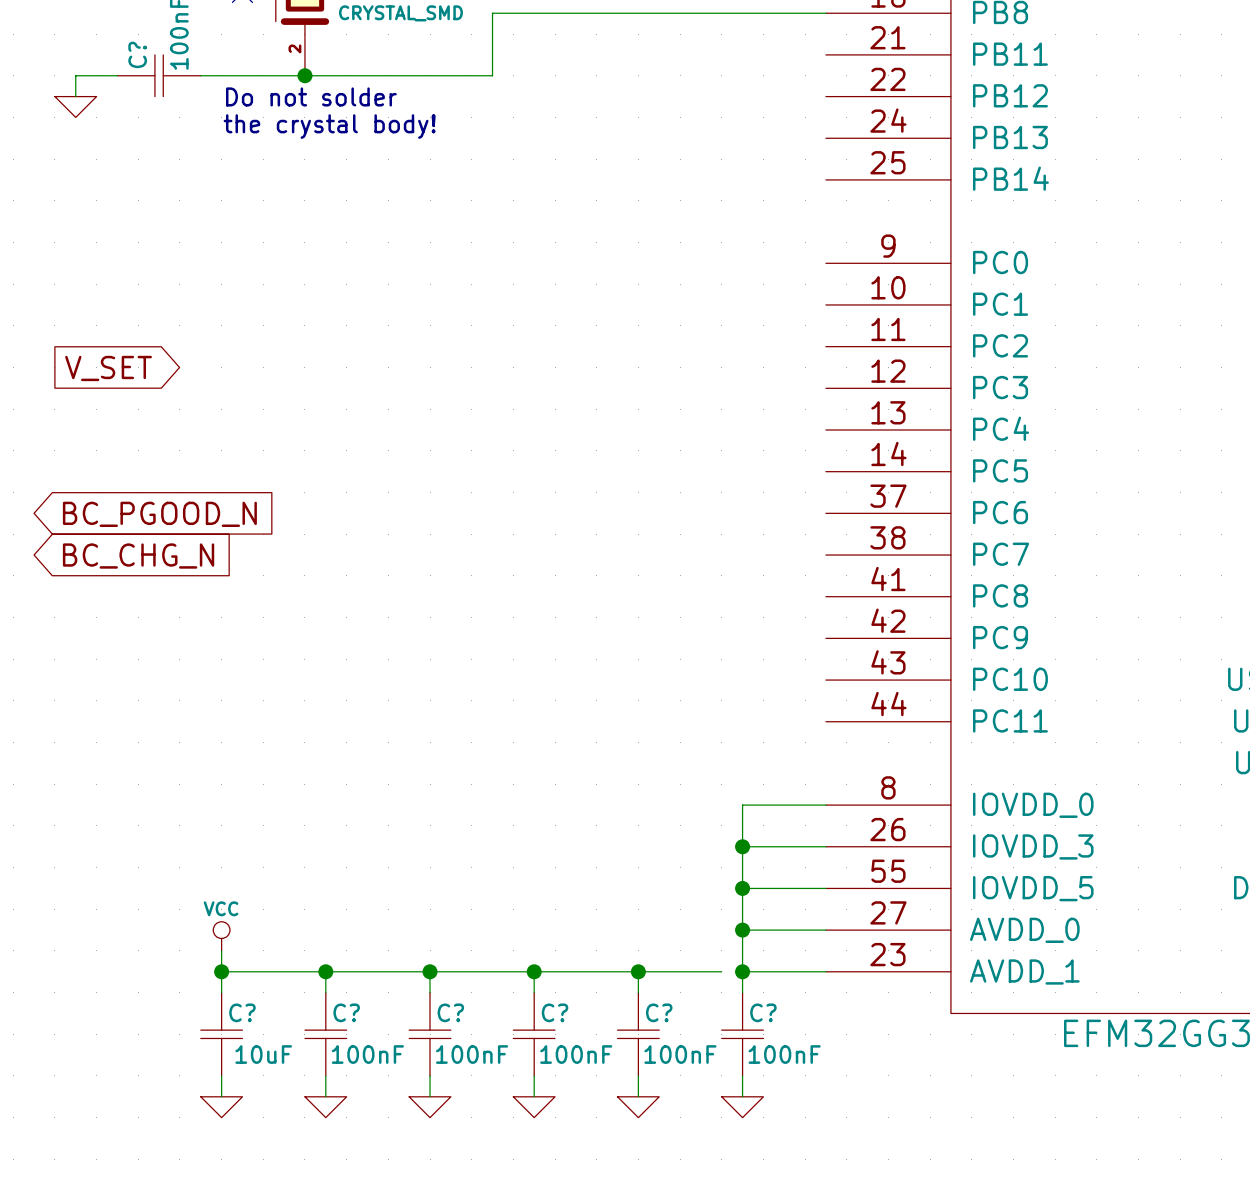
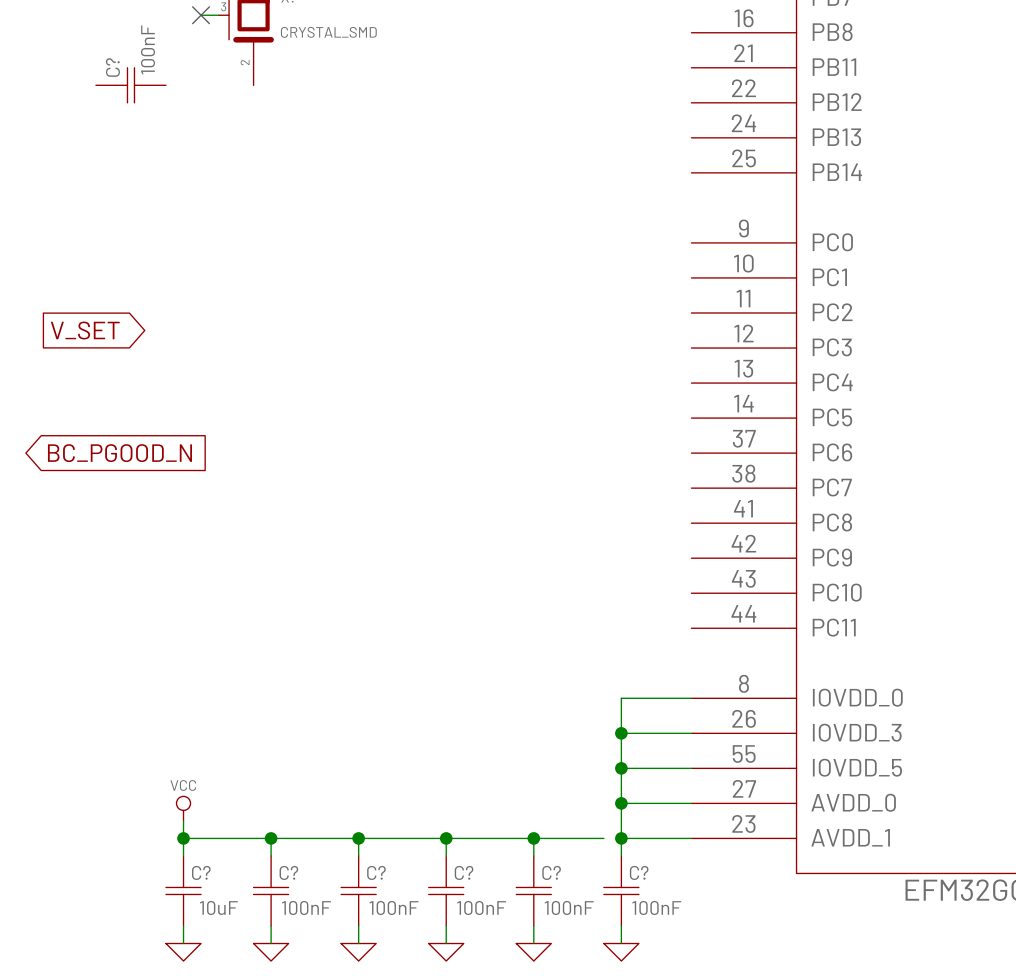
wire: (825, 13) (492, 13) (492, 75) (200, 75) -> none
wire: (117, 75) (75, 75) (75, 96) -> none
junction: (304, 75) -> none
text: Do not solder (311, 96) -> none
power symbol: (75, 107) -> none
text: the crystal body! (329, 126) -> none
global label: BC_CHG_N (138, 556) -> none

